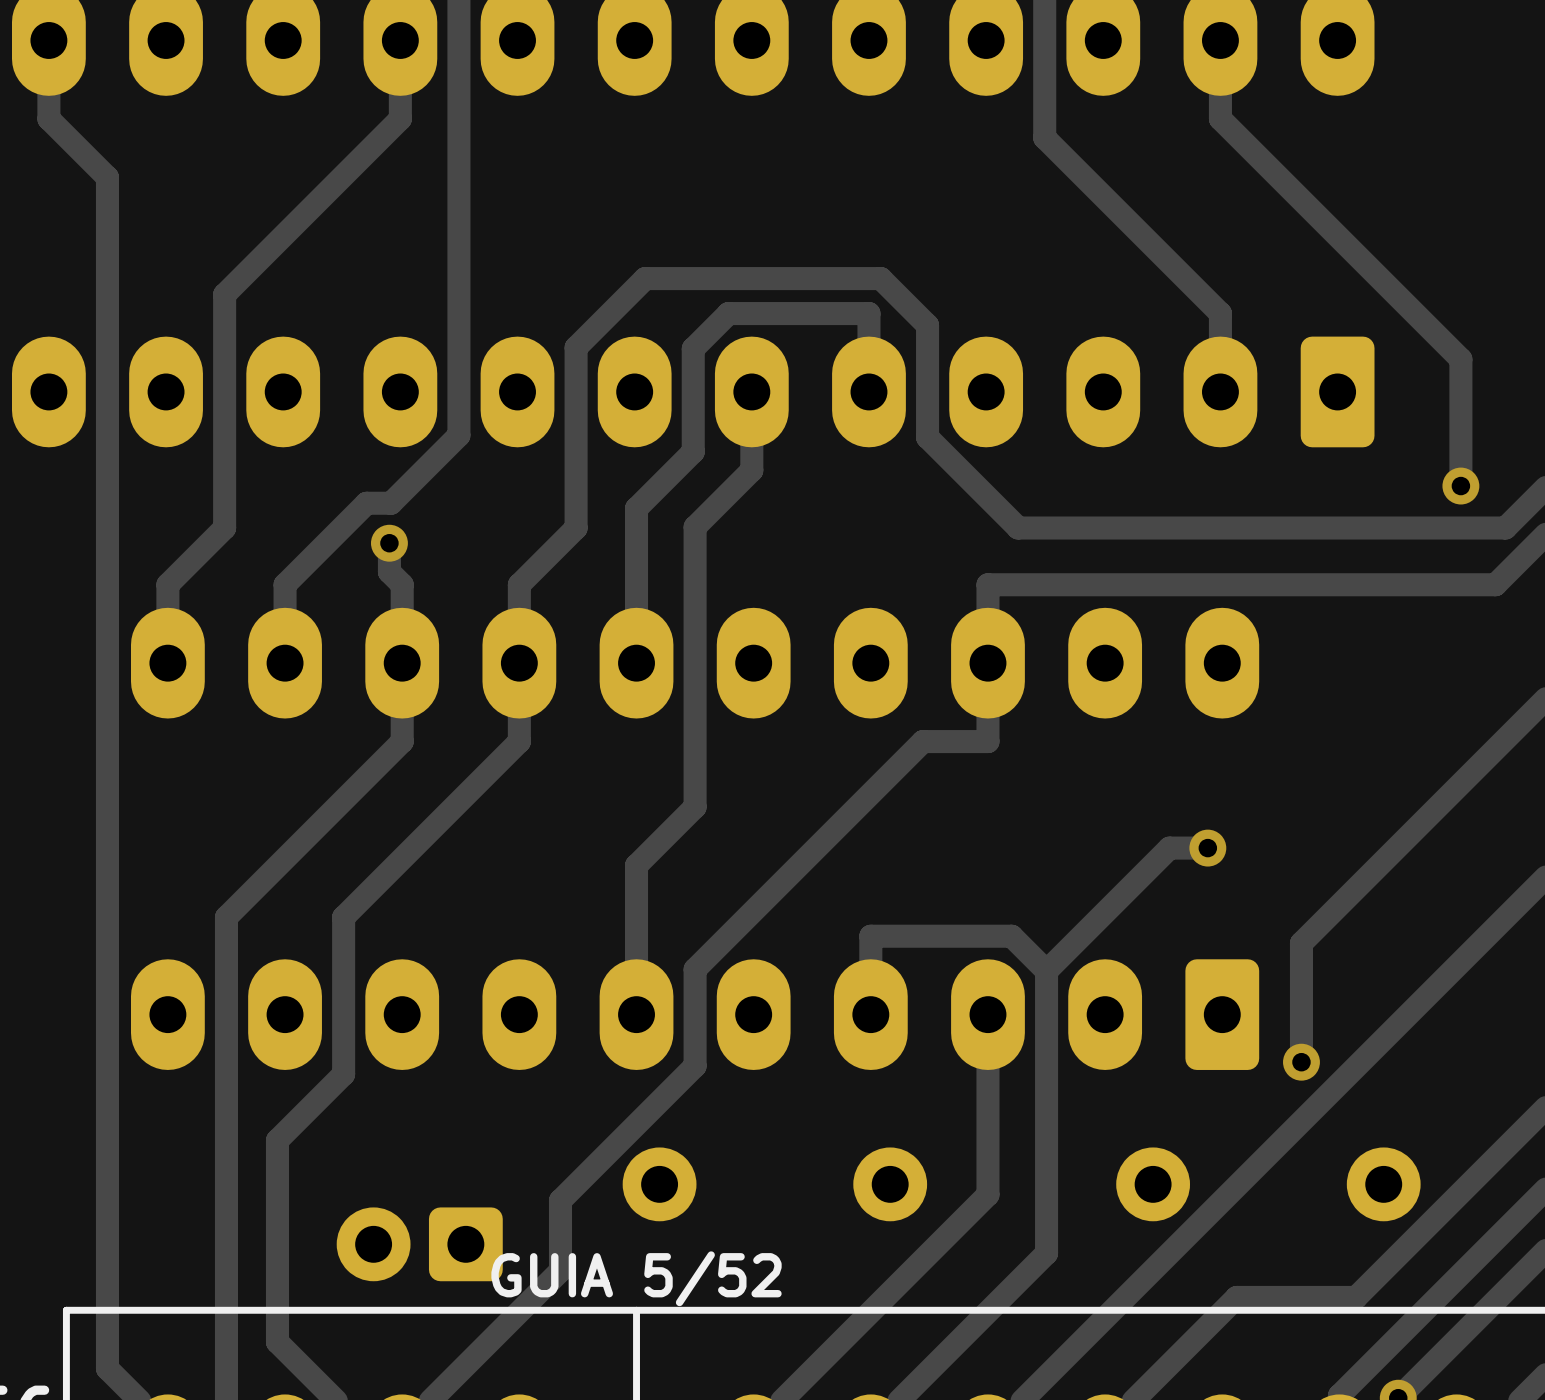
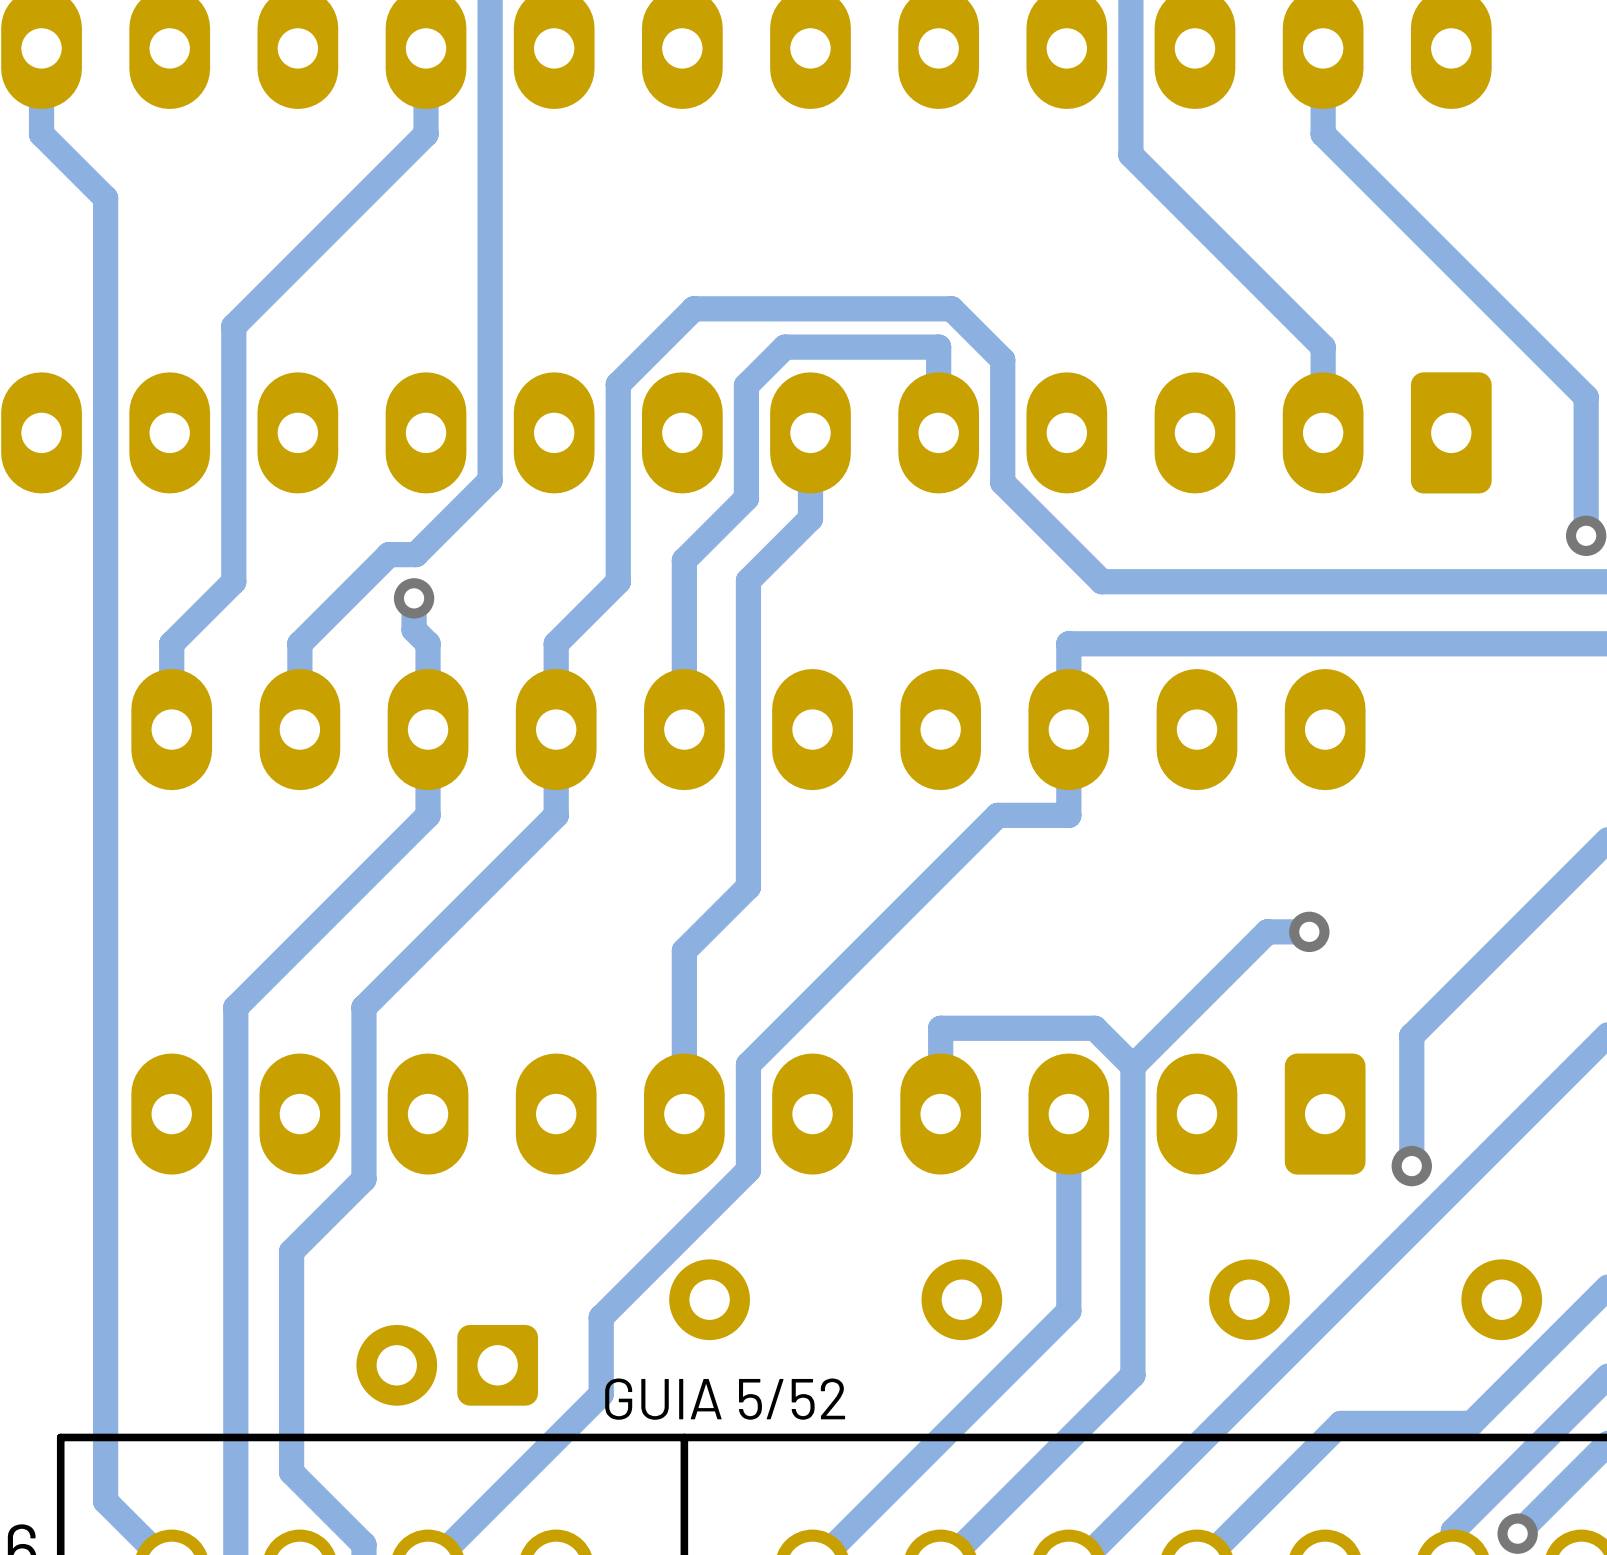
part text position: GUIA 5/52 (636, 1278) -> GUIA 5/52 (725, 1399)

